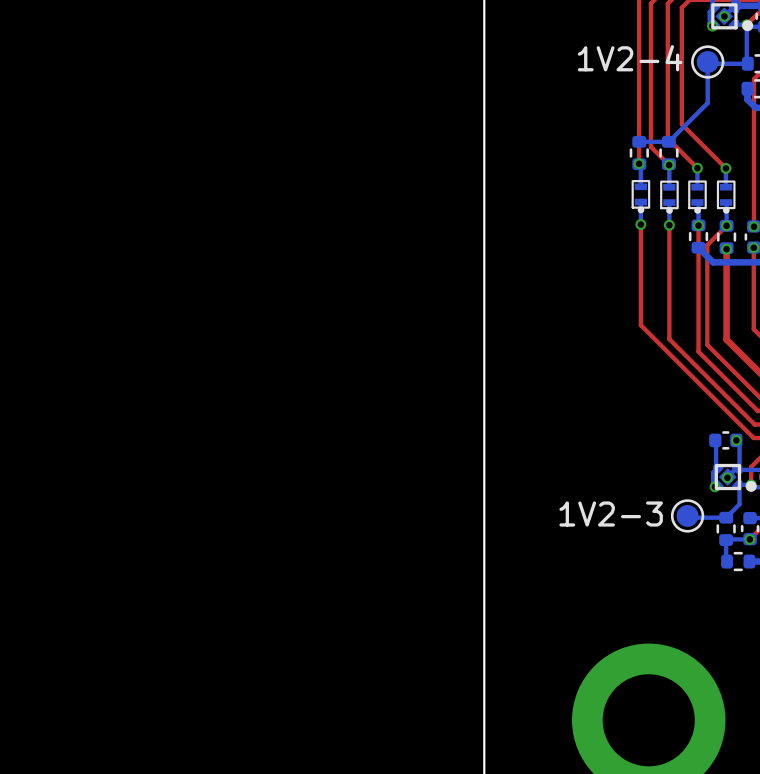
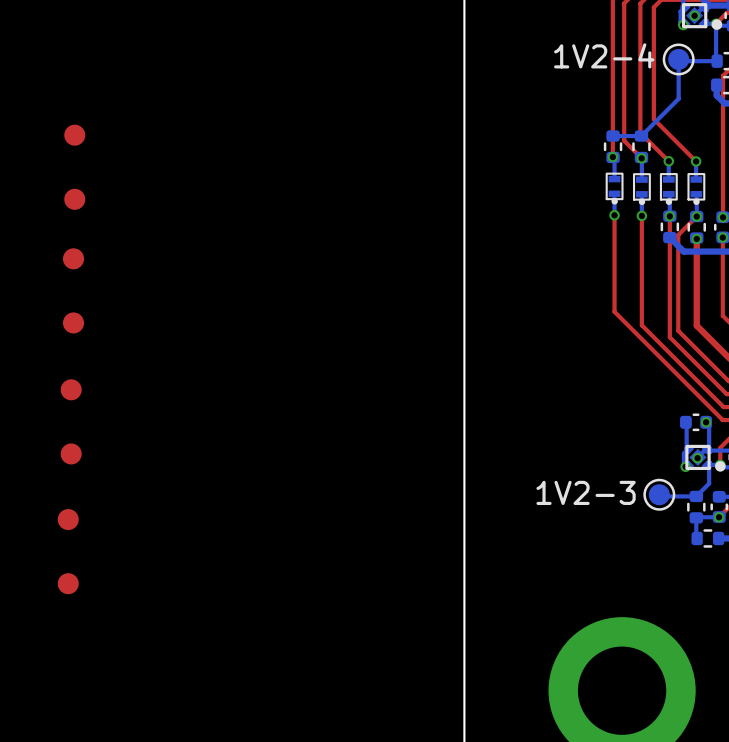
part: none -> (74, 135)
part: none -> (74, 199)
part: none -> (73, 258)
part: none -> (73, 322)
part: none -> (71, 389)
part: none -> (71, 453)
part: none -> (68, 519)
part: none -> (68, 583)

